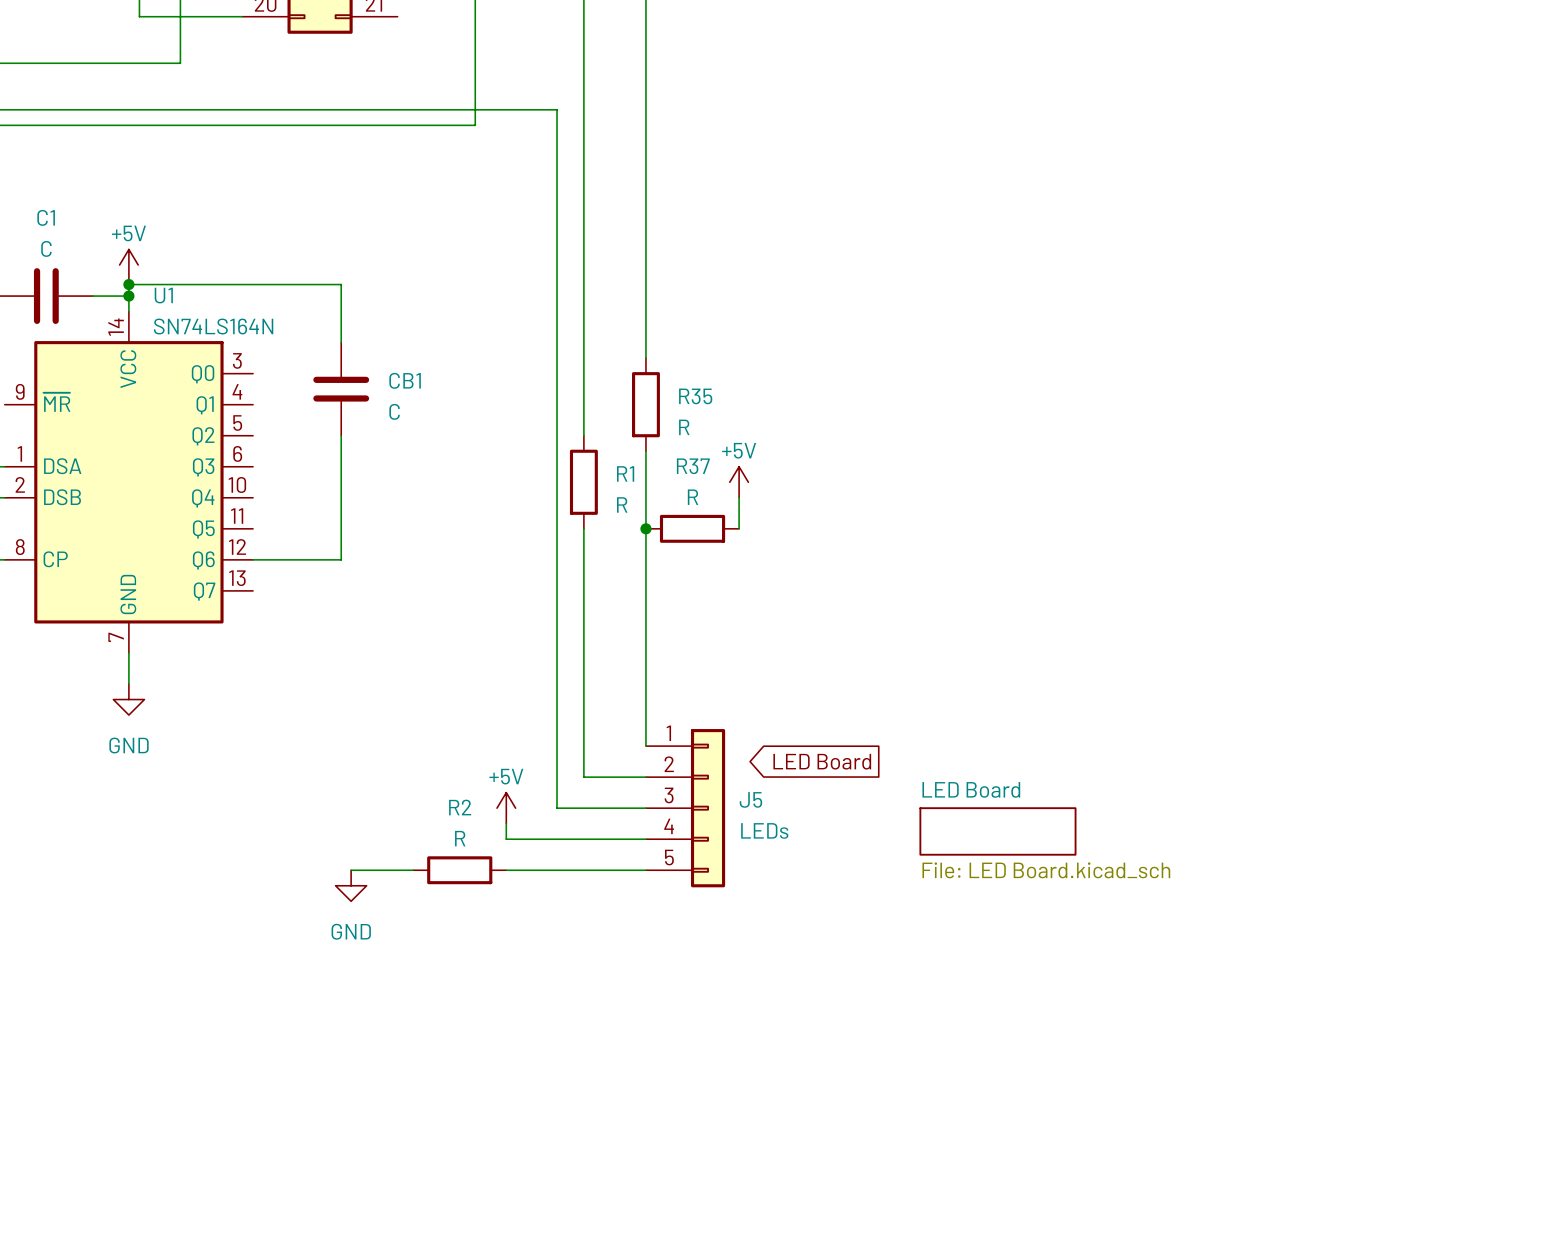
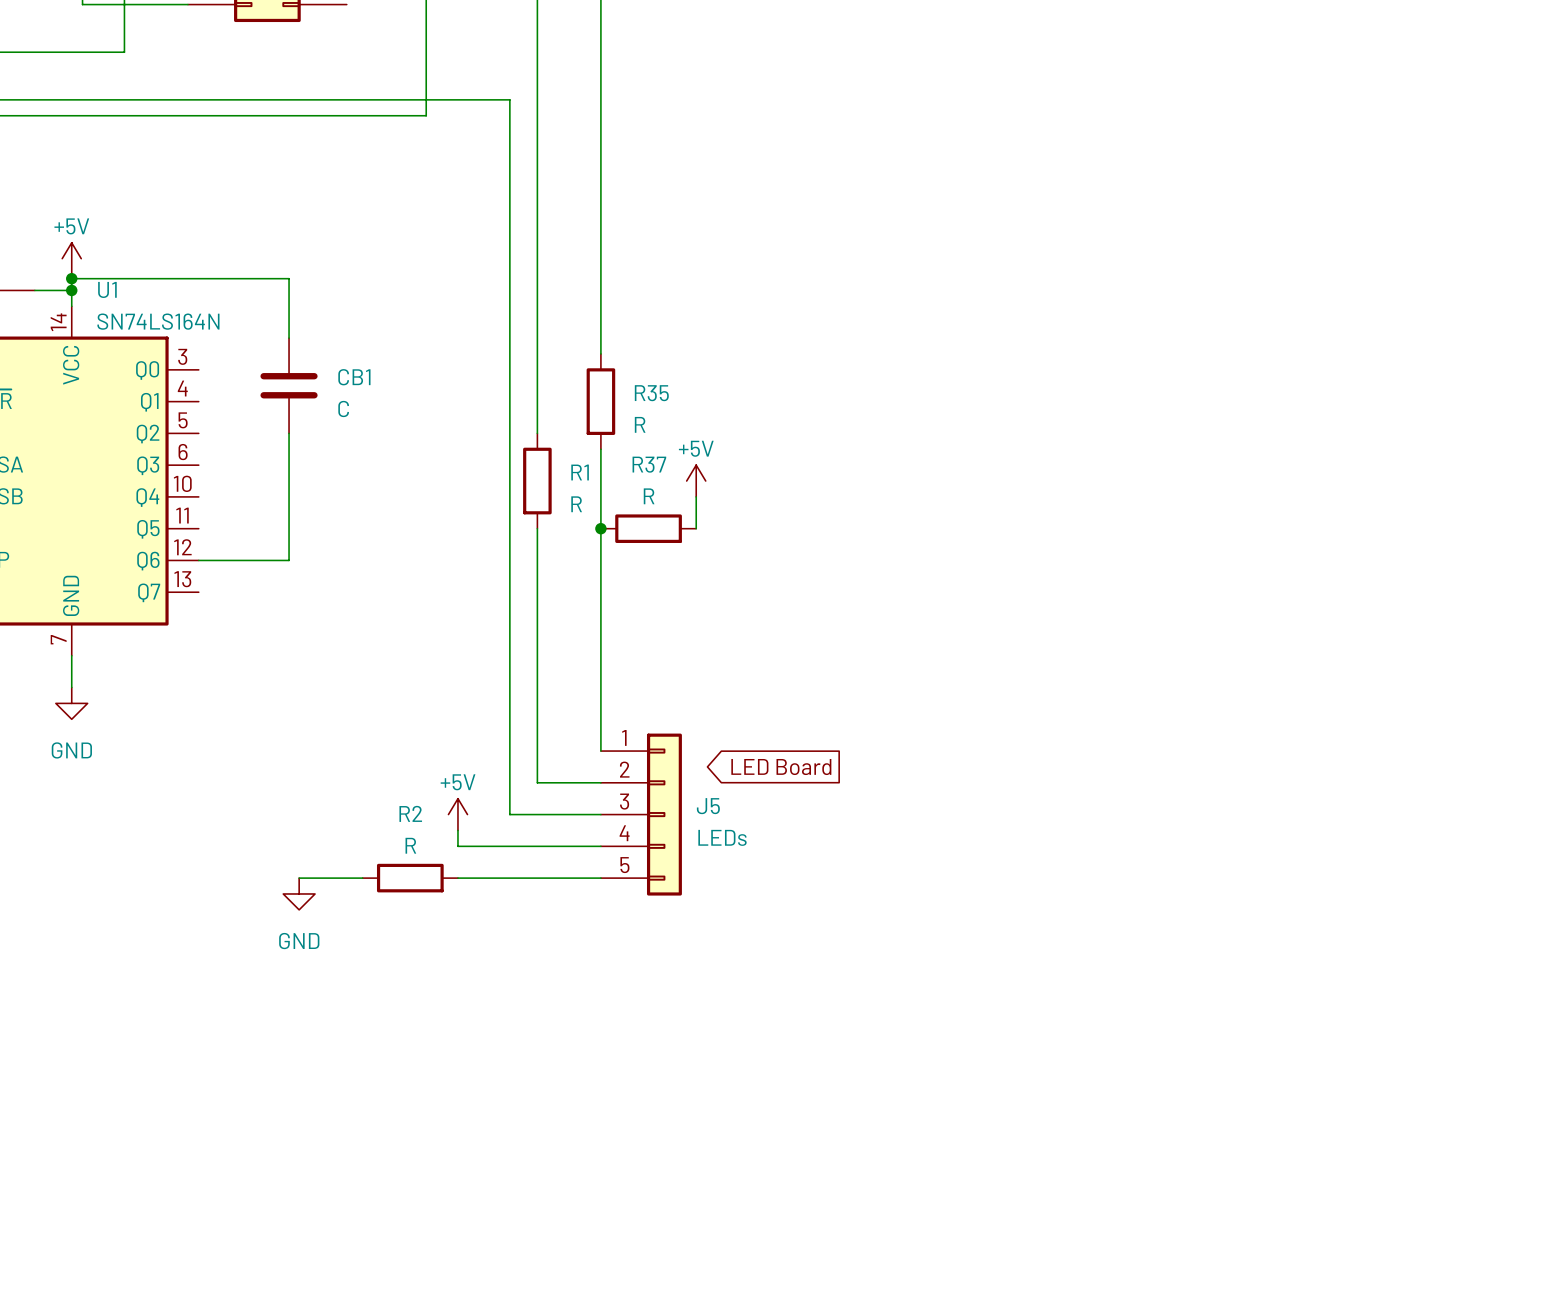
sheet LED Board: File: LED Board.kicad_sch (997, 831) -> none

